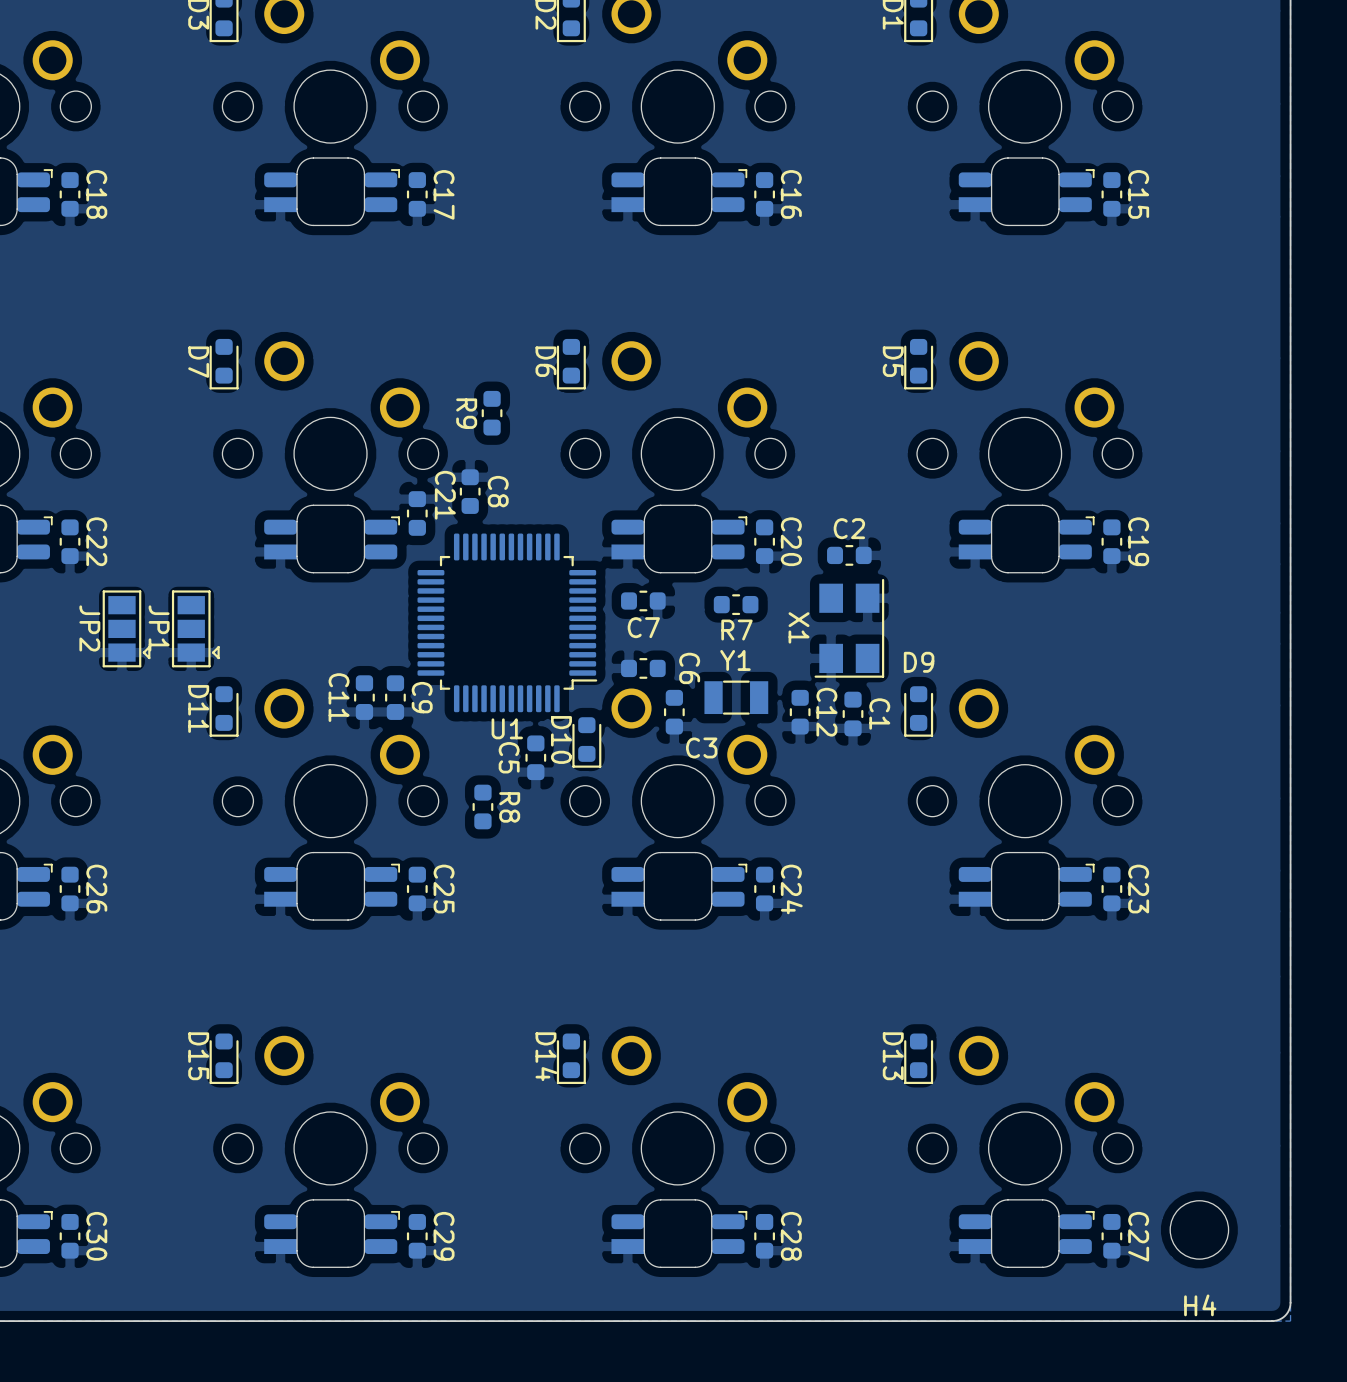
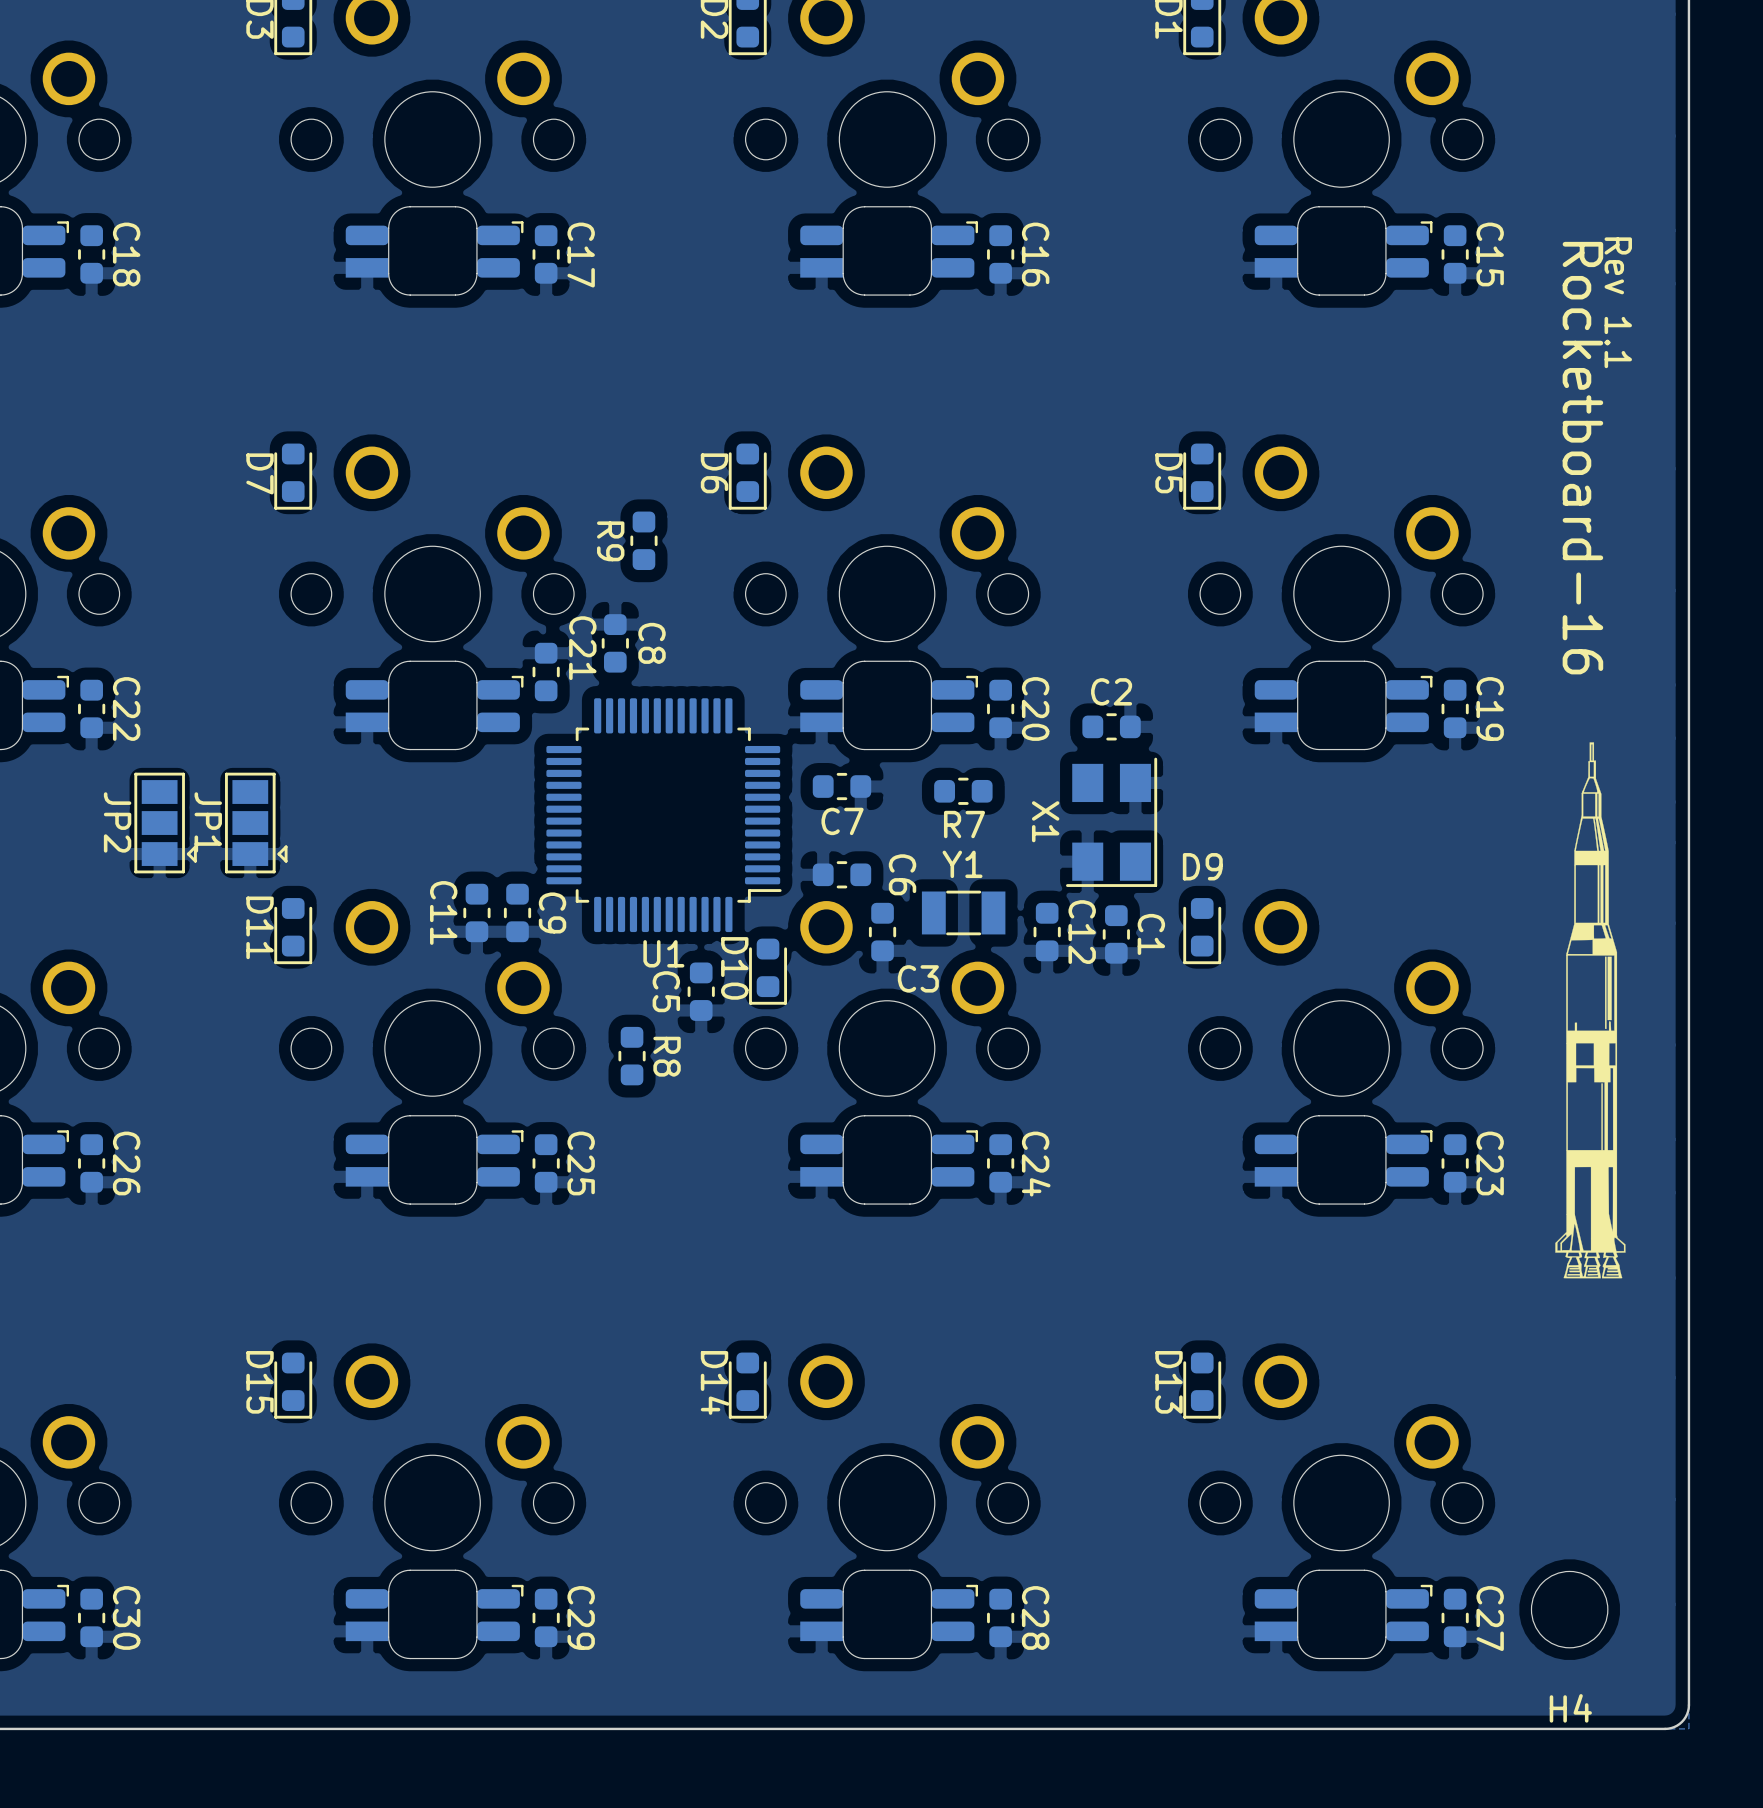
drawing: none -> [1562, 237, 1632, 675]
drawing: none -> [1555, 742, 1626, 1279]

